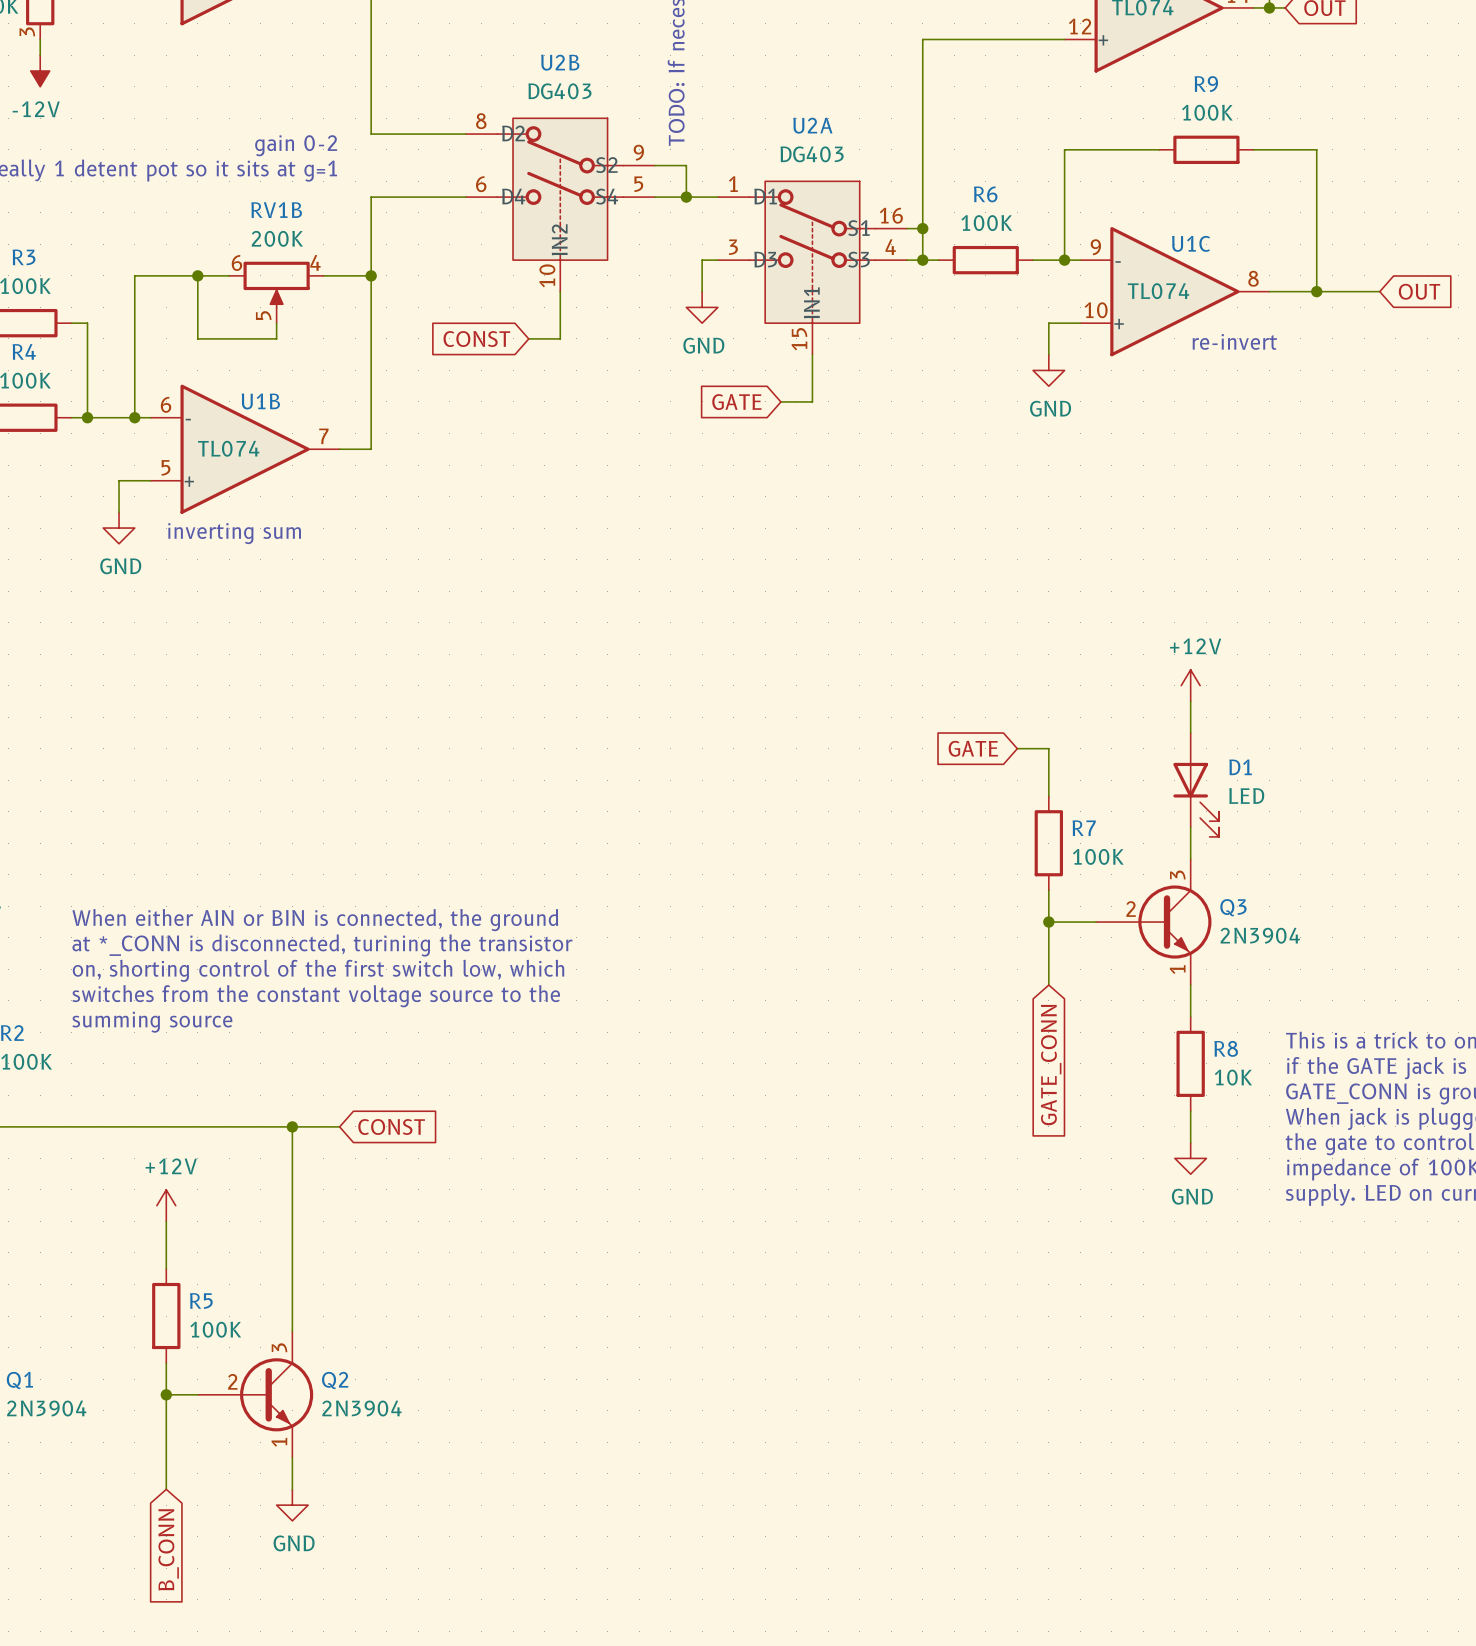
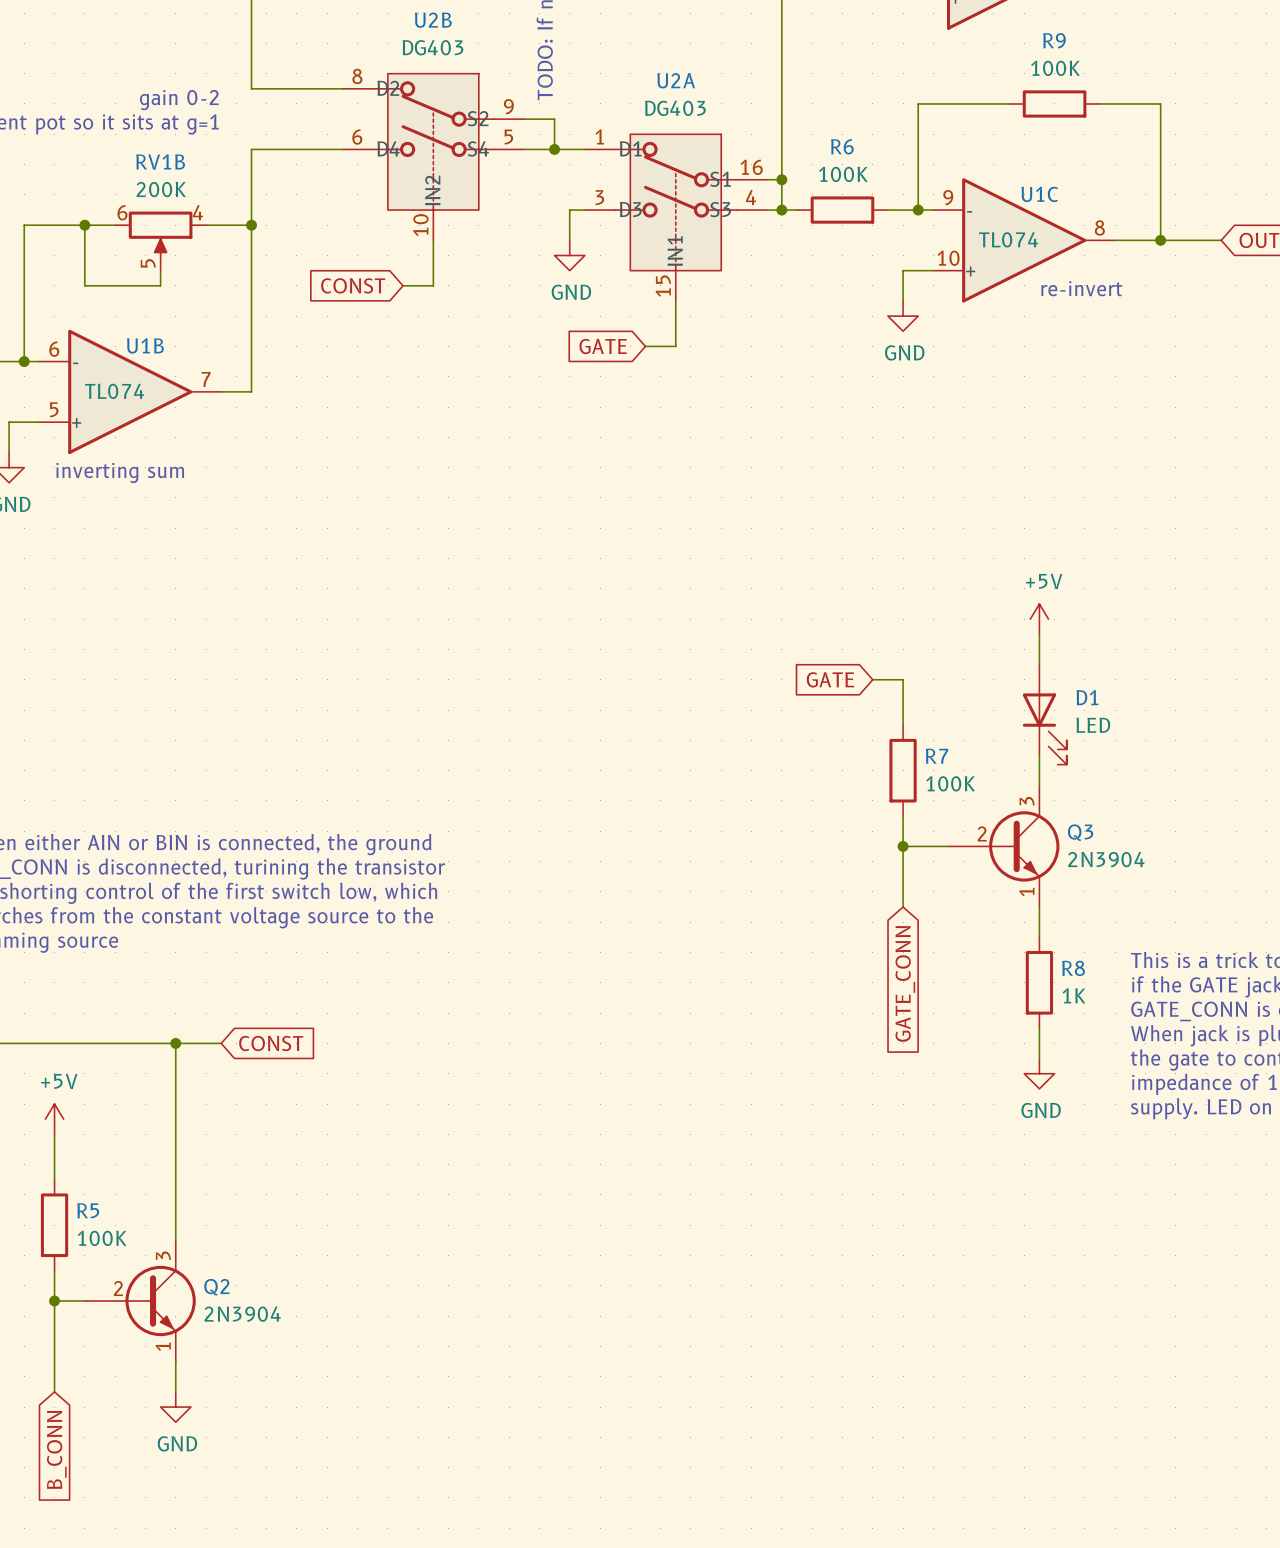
power symbol: +12V (1190, 685) -> +5V (1039, 619)
R8 value: 10K (1233, 1077) -> 1K (1074, 995)
power symbol: +12V (166, 1205) -> +5V (54, 1119)

